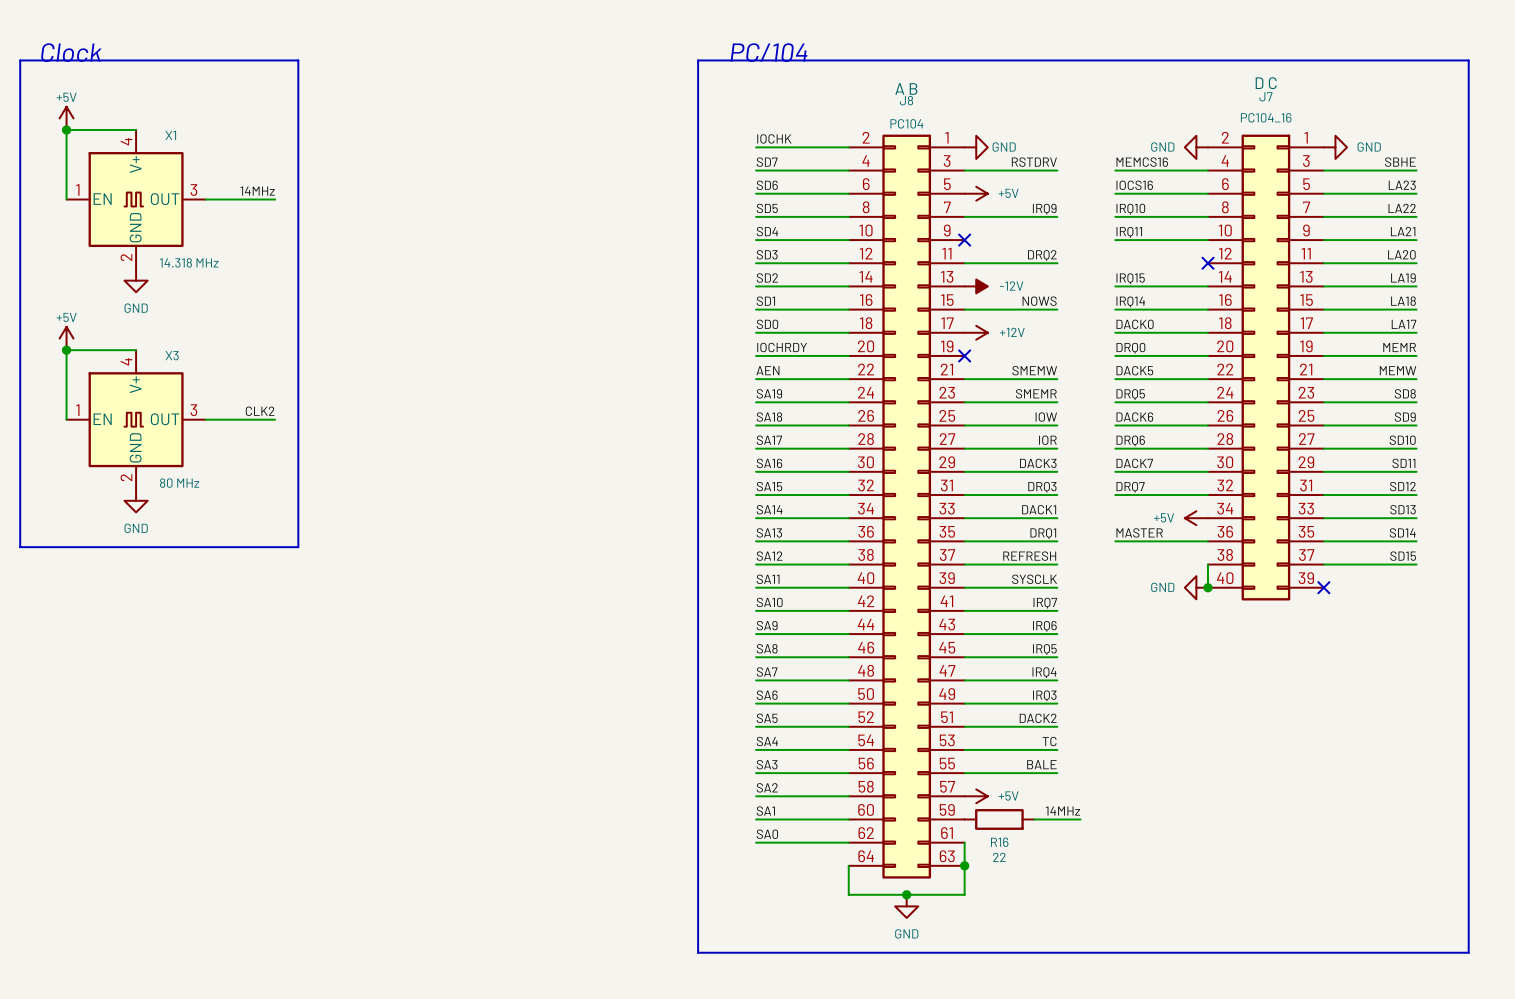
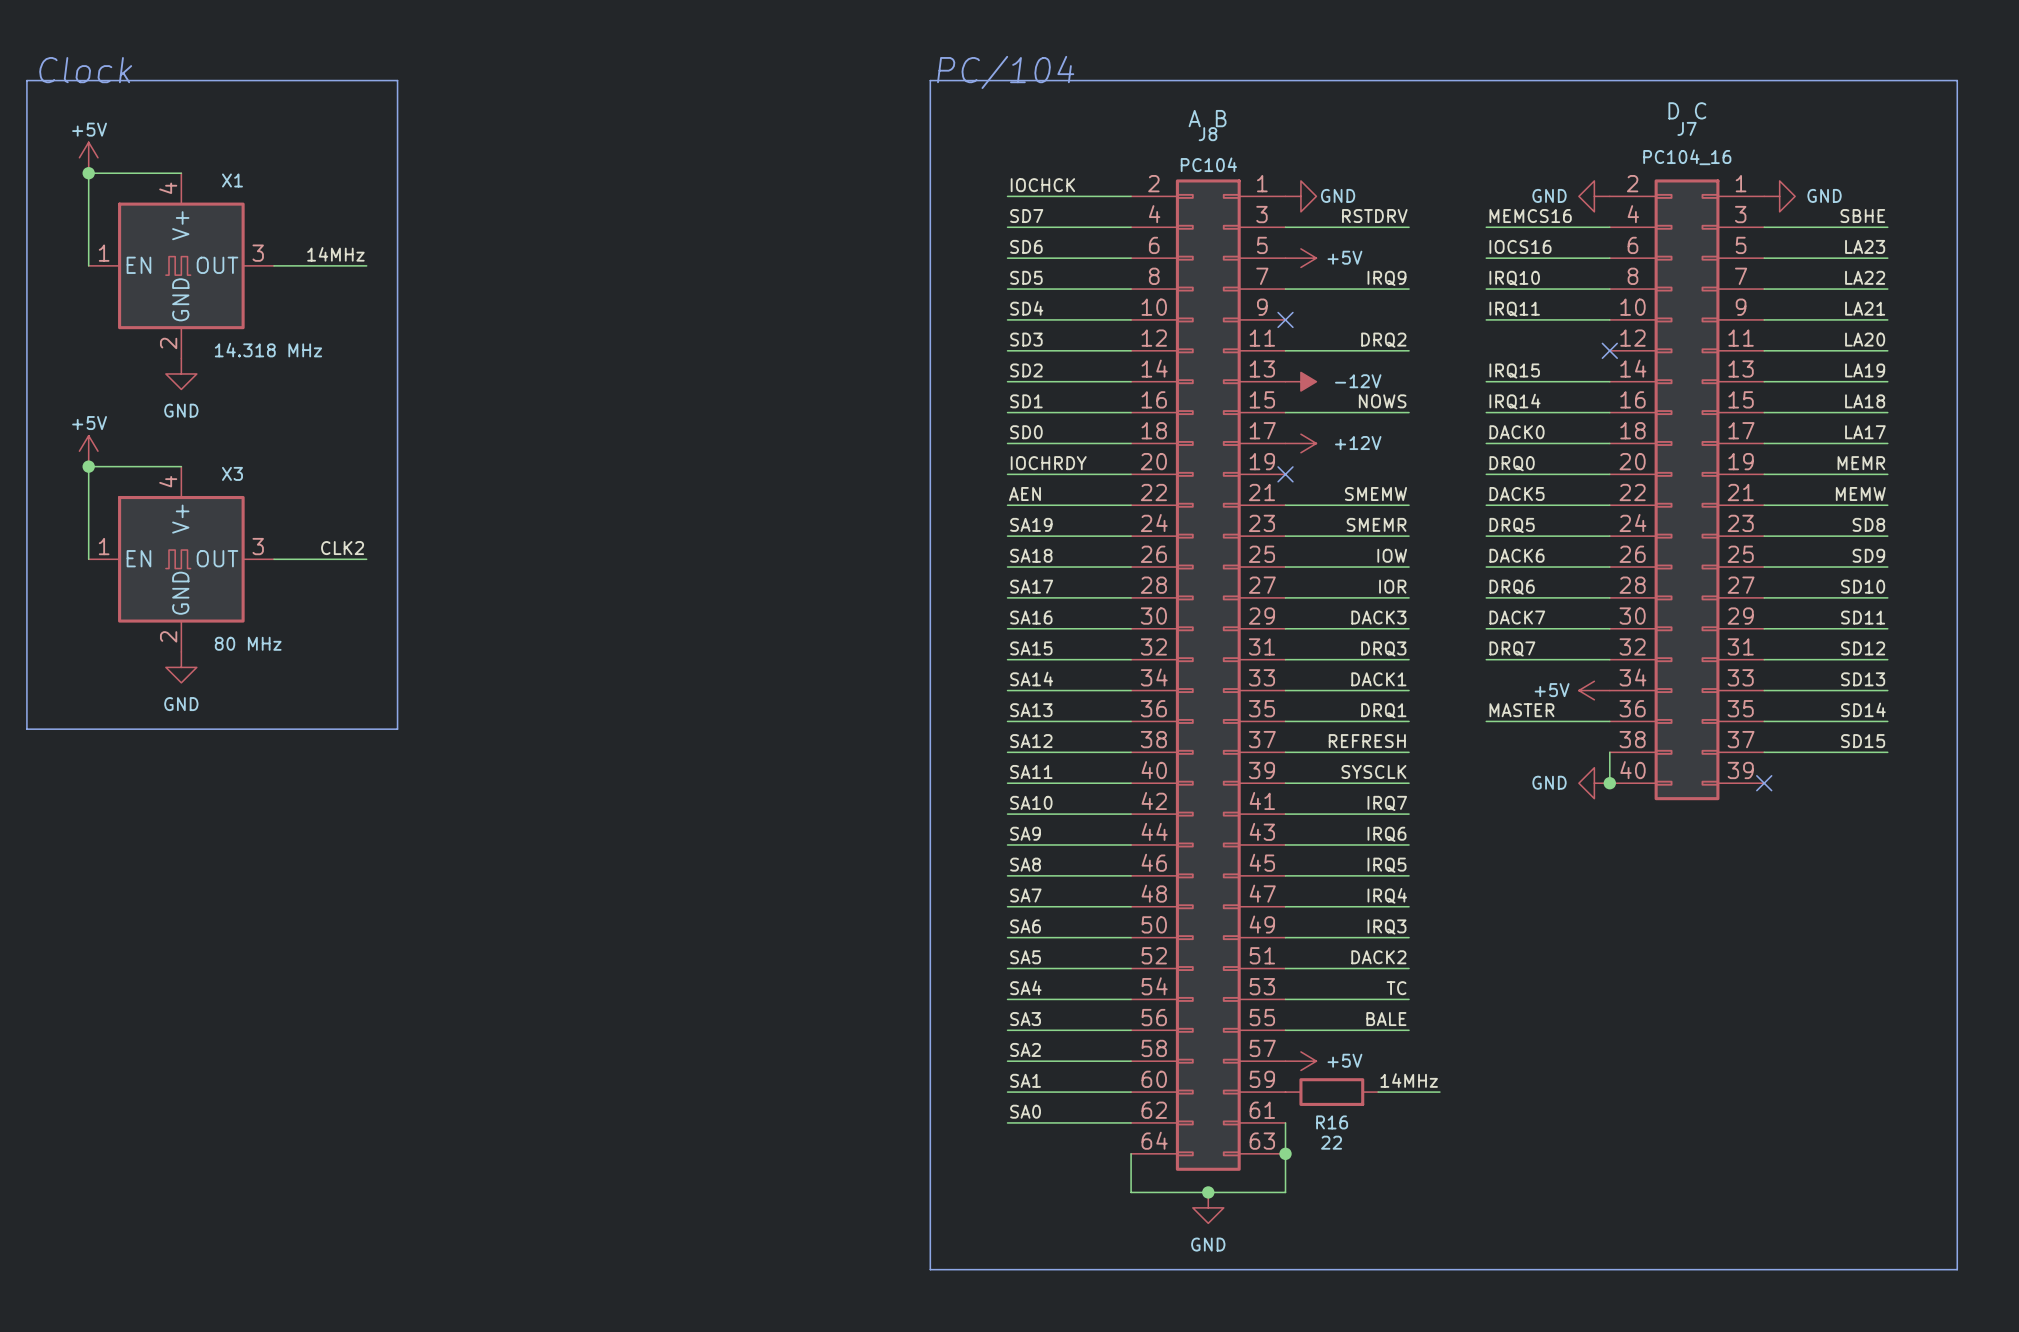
label: IOCHK (774, 138) -> IOCHCK (1042, 185)

